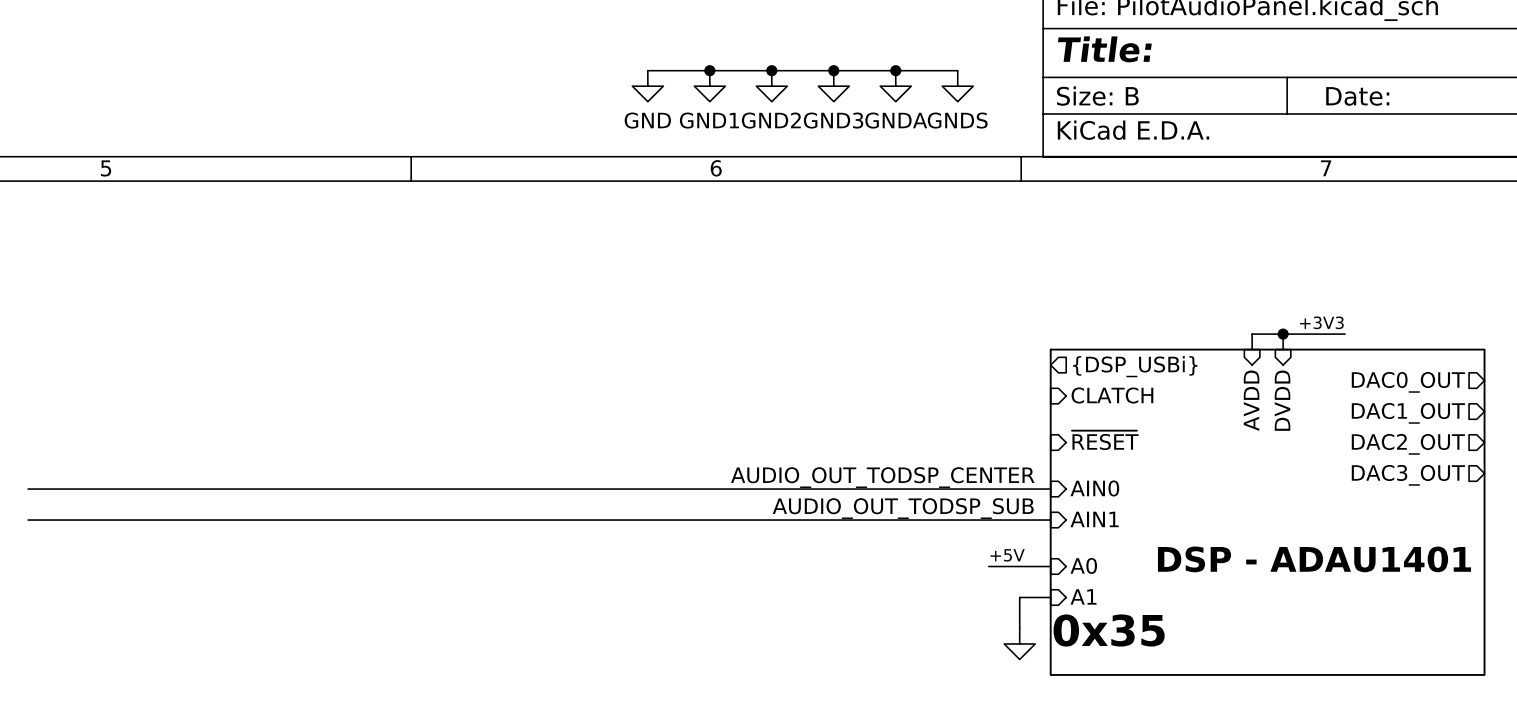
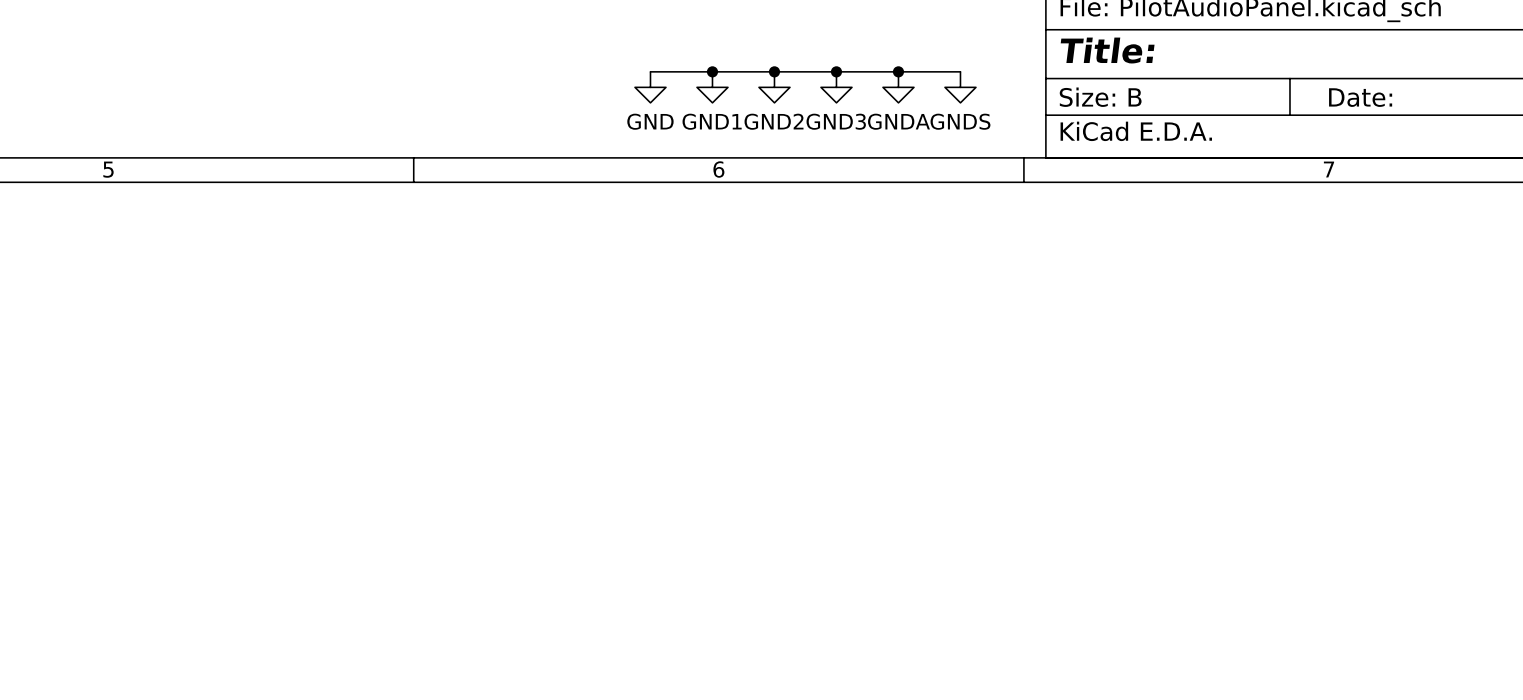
label: +3V3 (1321, 322) -> none
wire: (1283, 334) (1283, 349) -> none
junction: (1283, 334) -> none
wire: (1345, 334) (1252, 334) (1252, 349) -> none
sheet pin: {DSP_USBi} (1135, 366) -> none
sheet pin: DAC0_OUT (1408, 382) -> none
sheet pin: CLATCH (1112, 395) -> none
sheet pin: AVDD (1251, 400) -> none
sheet pin: DVDD (1282, 400) -> none
sheet pin: DAC1_OUT (1408, 413) -> none
sheet pin: ~{RESET} (1105, 440) -> none
sheet pin: DAC2_OUT (1408, 444) -> none
sheet pin: DAC3_OUT (1408, 475) -> none
label: AUDIO_OUT_TODSP_CENTER (882, 477) -> none
sheet pin: AIN0 (1094, 488) -> none
wire: (28, 489) (1050, 489) -> none
label: AUDIO_OUT_TODSP_SUB (903, 508) -> none
sheet DSP - ADAU1401: (1267, 512) -> none
sheet pin: AIN1 (1094, 519) -> none
wire: (28, 520) (1050, 520) -> none
label: +5V (1007, 555) -> none
sheet pin: A0 (1083, 565) -> none
wire: (988, 566) (1050, 566) -> none
sheet pin: A1 (1083, 596) -> none
wire: (1050, 597) (1019, 597) (1019, 628) -> none
text: 0x35 (1109, 630) -> none
power symbol: (1019, 643) -> none

